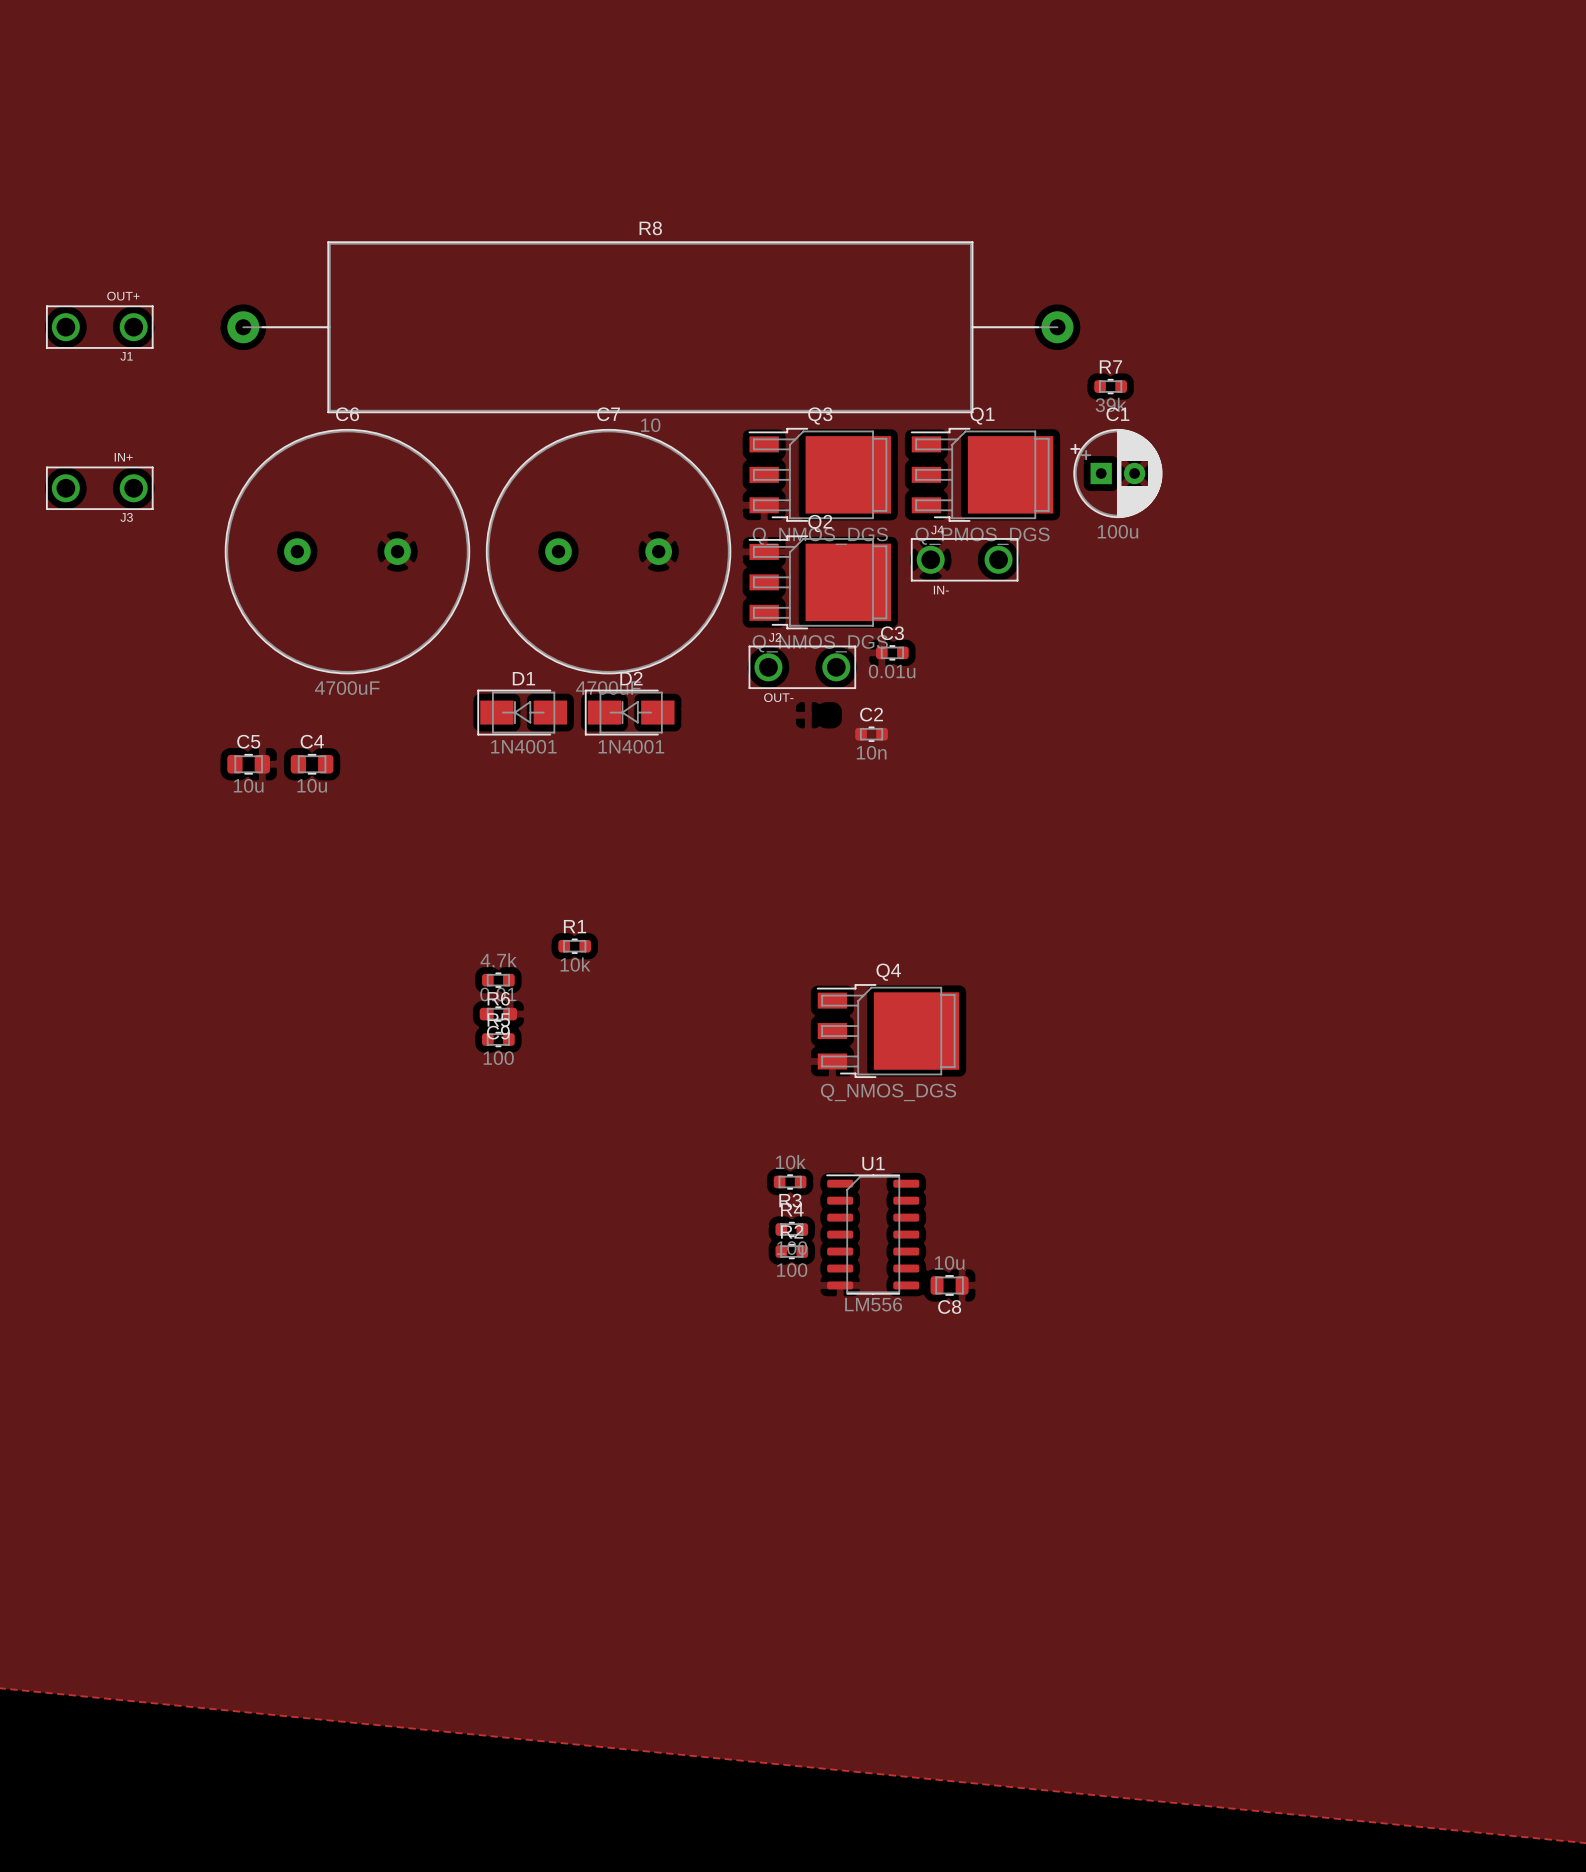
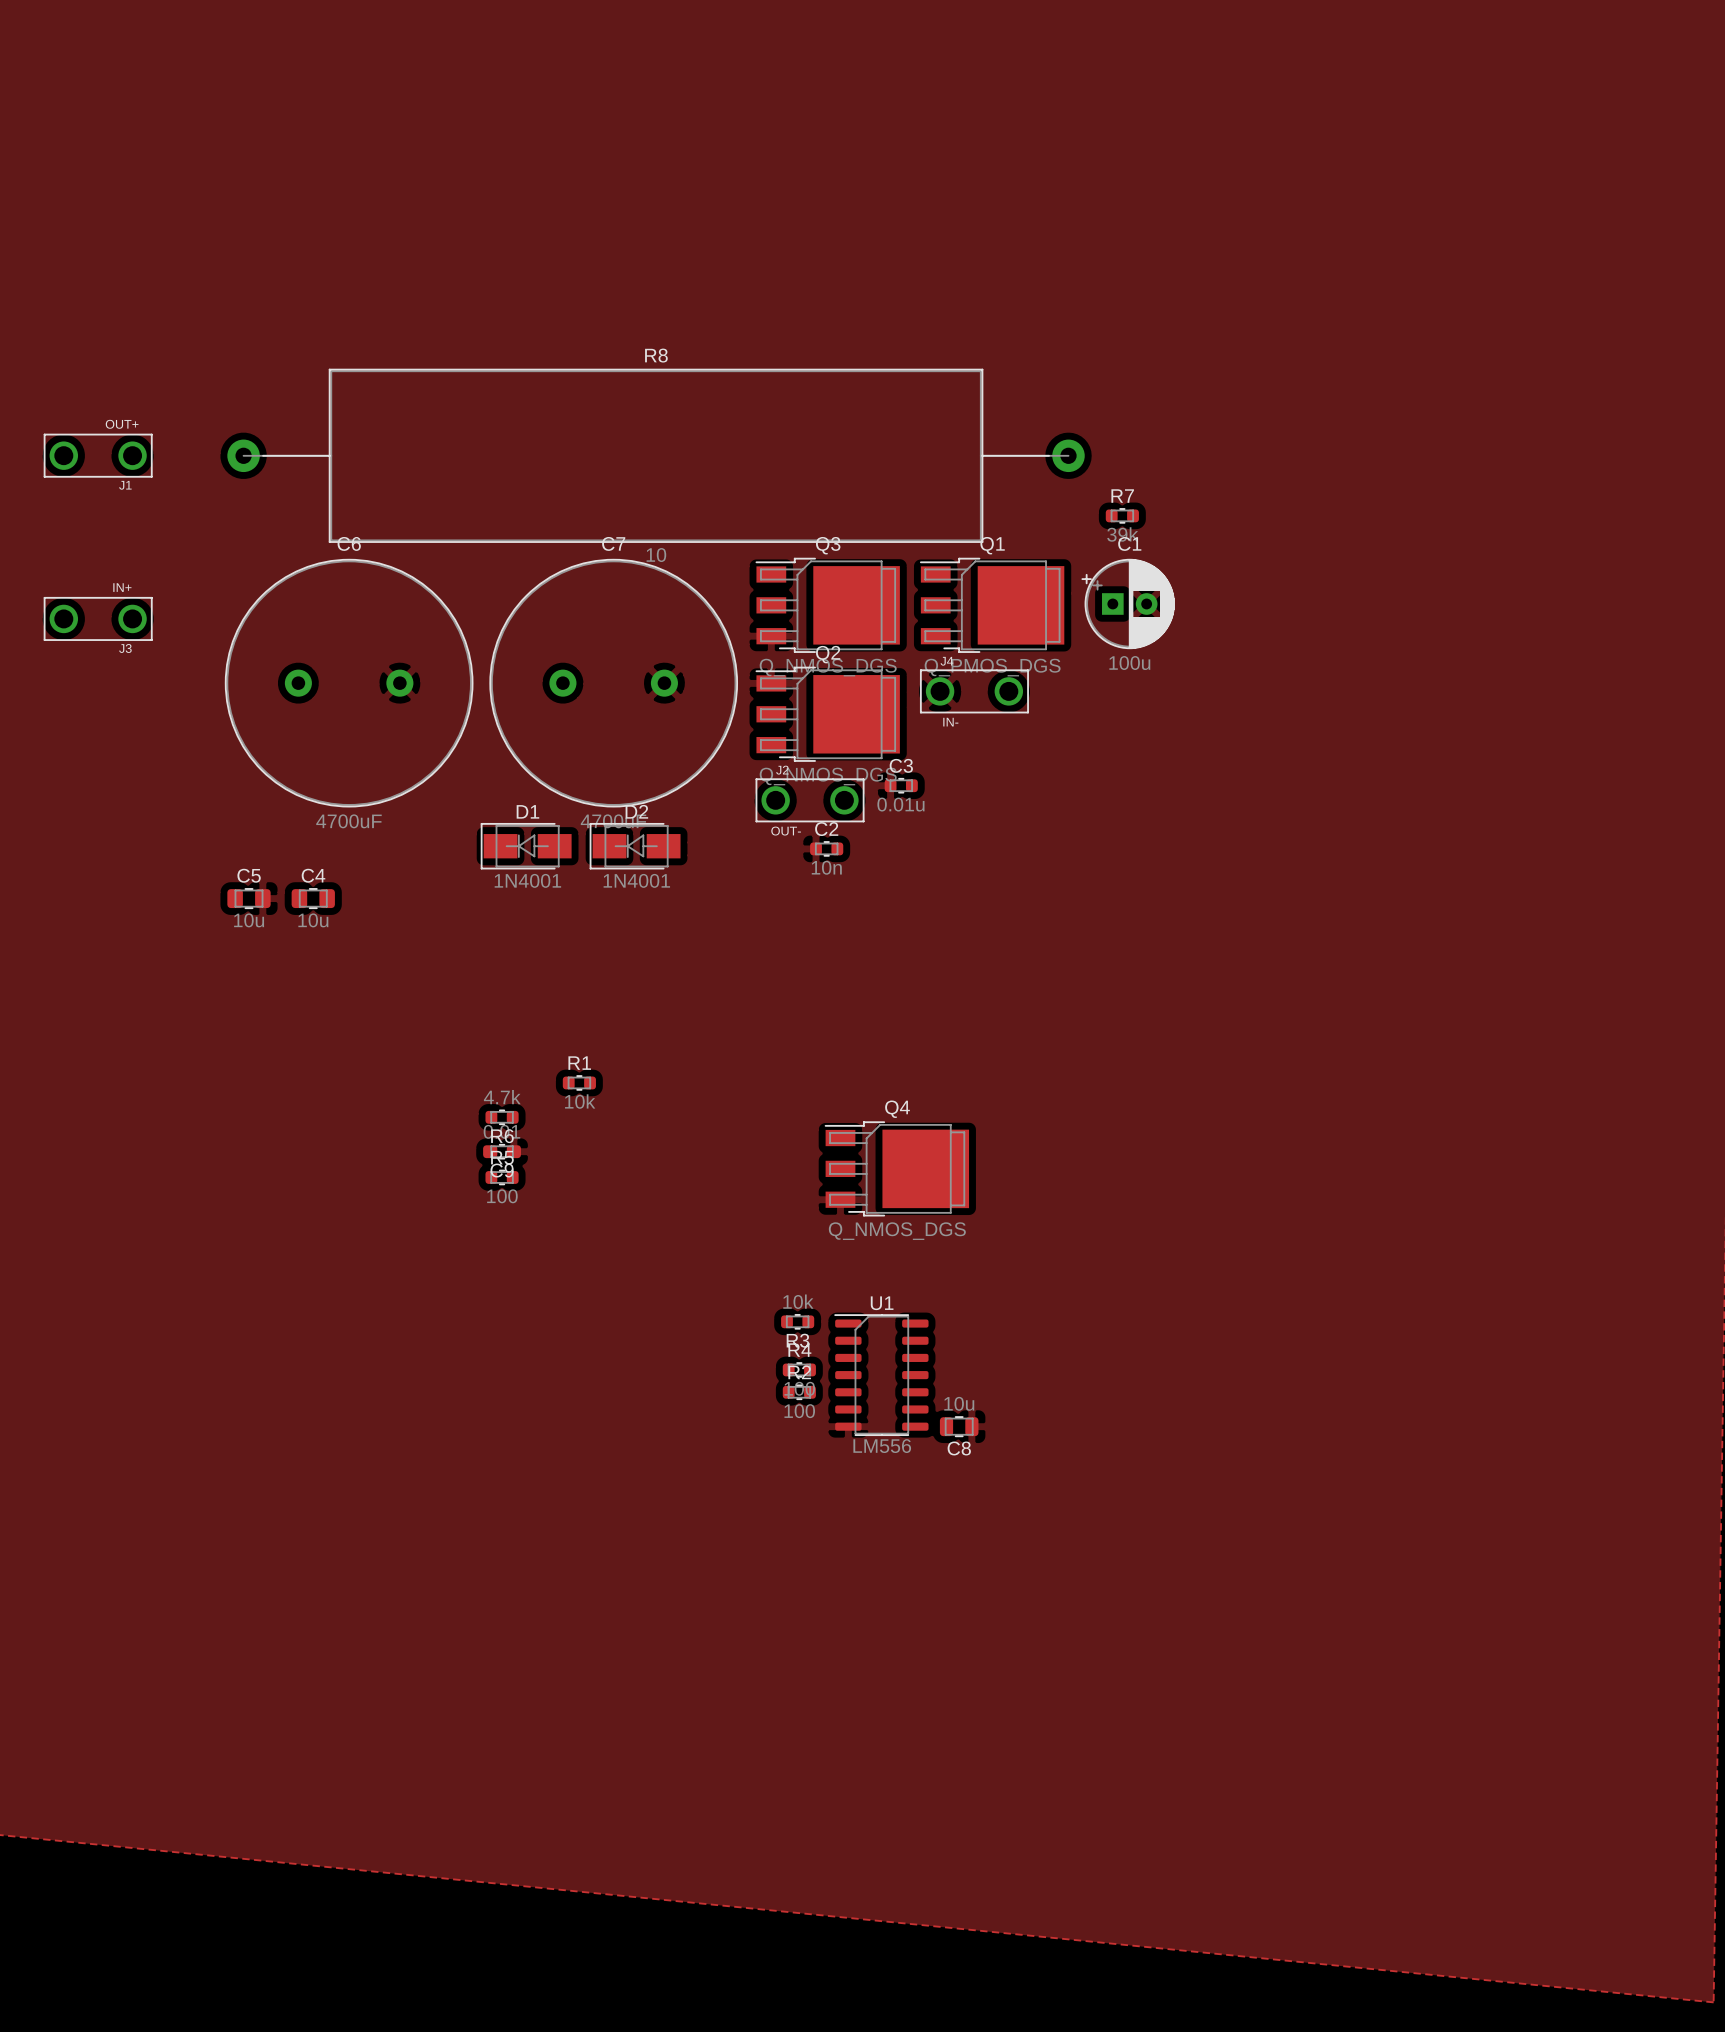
C2 position: (871, 734) -> (826, 848)

